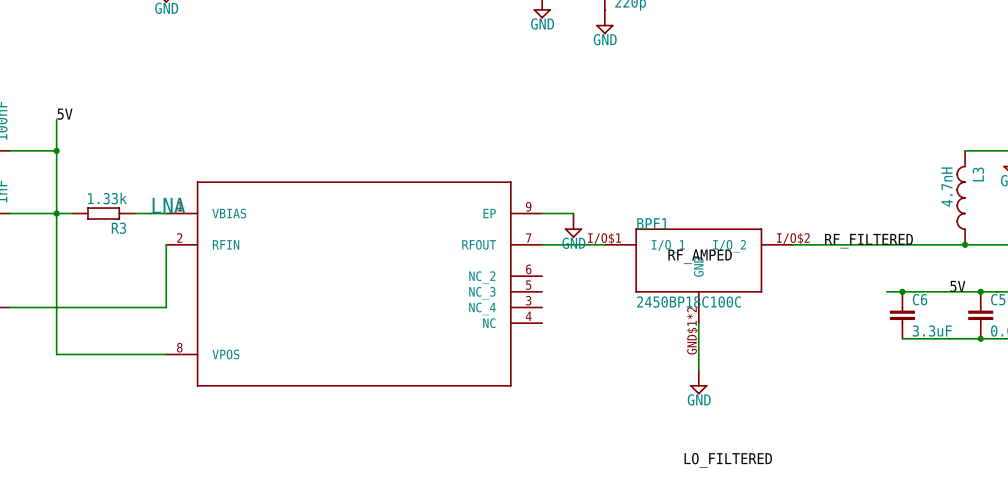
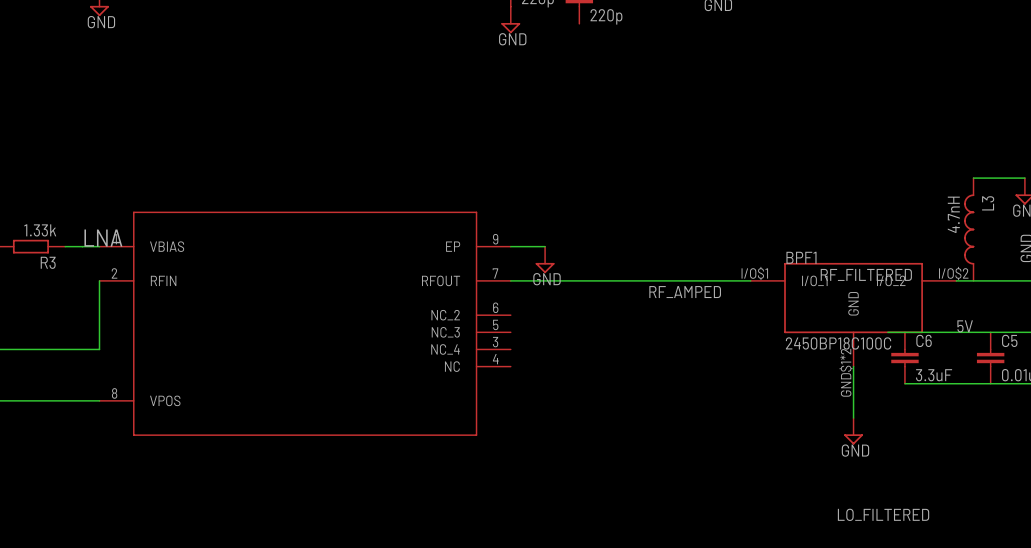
power symbol: GND (604, 22) -> none
wire: none -> (579, 280) (750, 280)
wire: (792, 244) (949, 244) -> none
junction: (965, 244) -> none
BPF1 position: (698, 275) -> (853, 314)
junction: (902, 291) -> none
junction: (980, 291) -> none
wire: (698, 323) (698, 370) -> none
wire: none -> (853, 366) (853, 418)
junction: (980, 338) -> none
power symbol: GND (698, 382) -> none
power symbol: none -> GND (853, 431)
label: LO_FILTERED (728, 460) -> none
label: none -> LO_FILTERED (883, 514)

